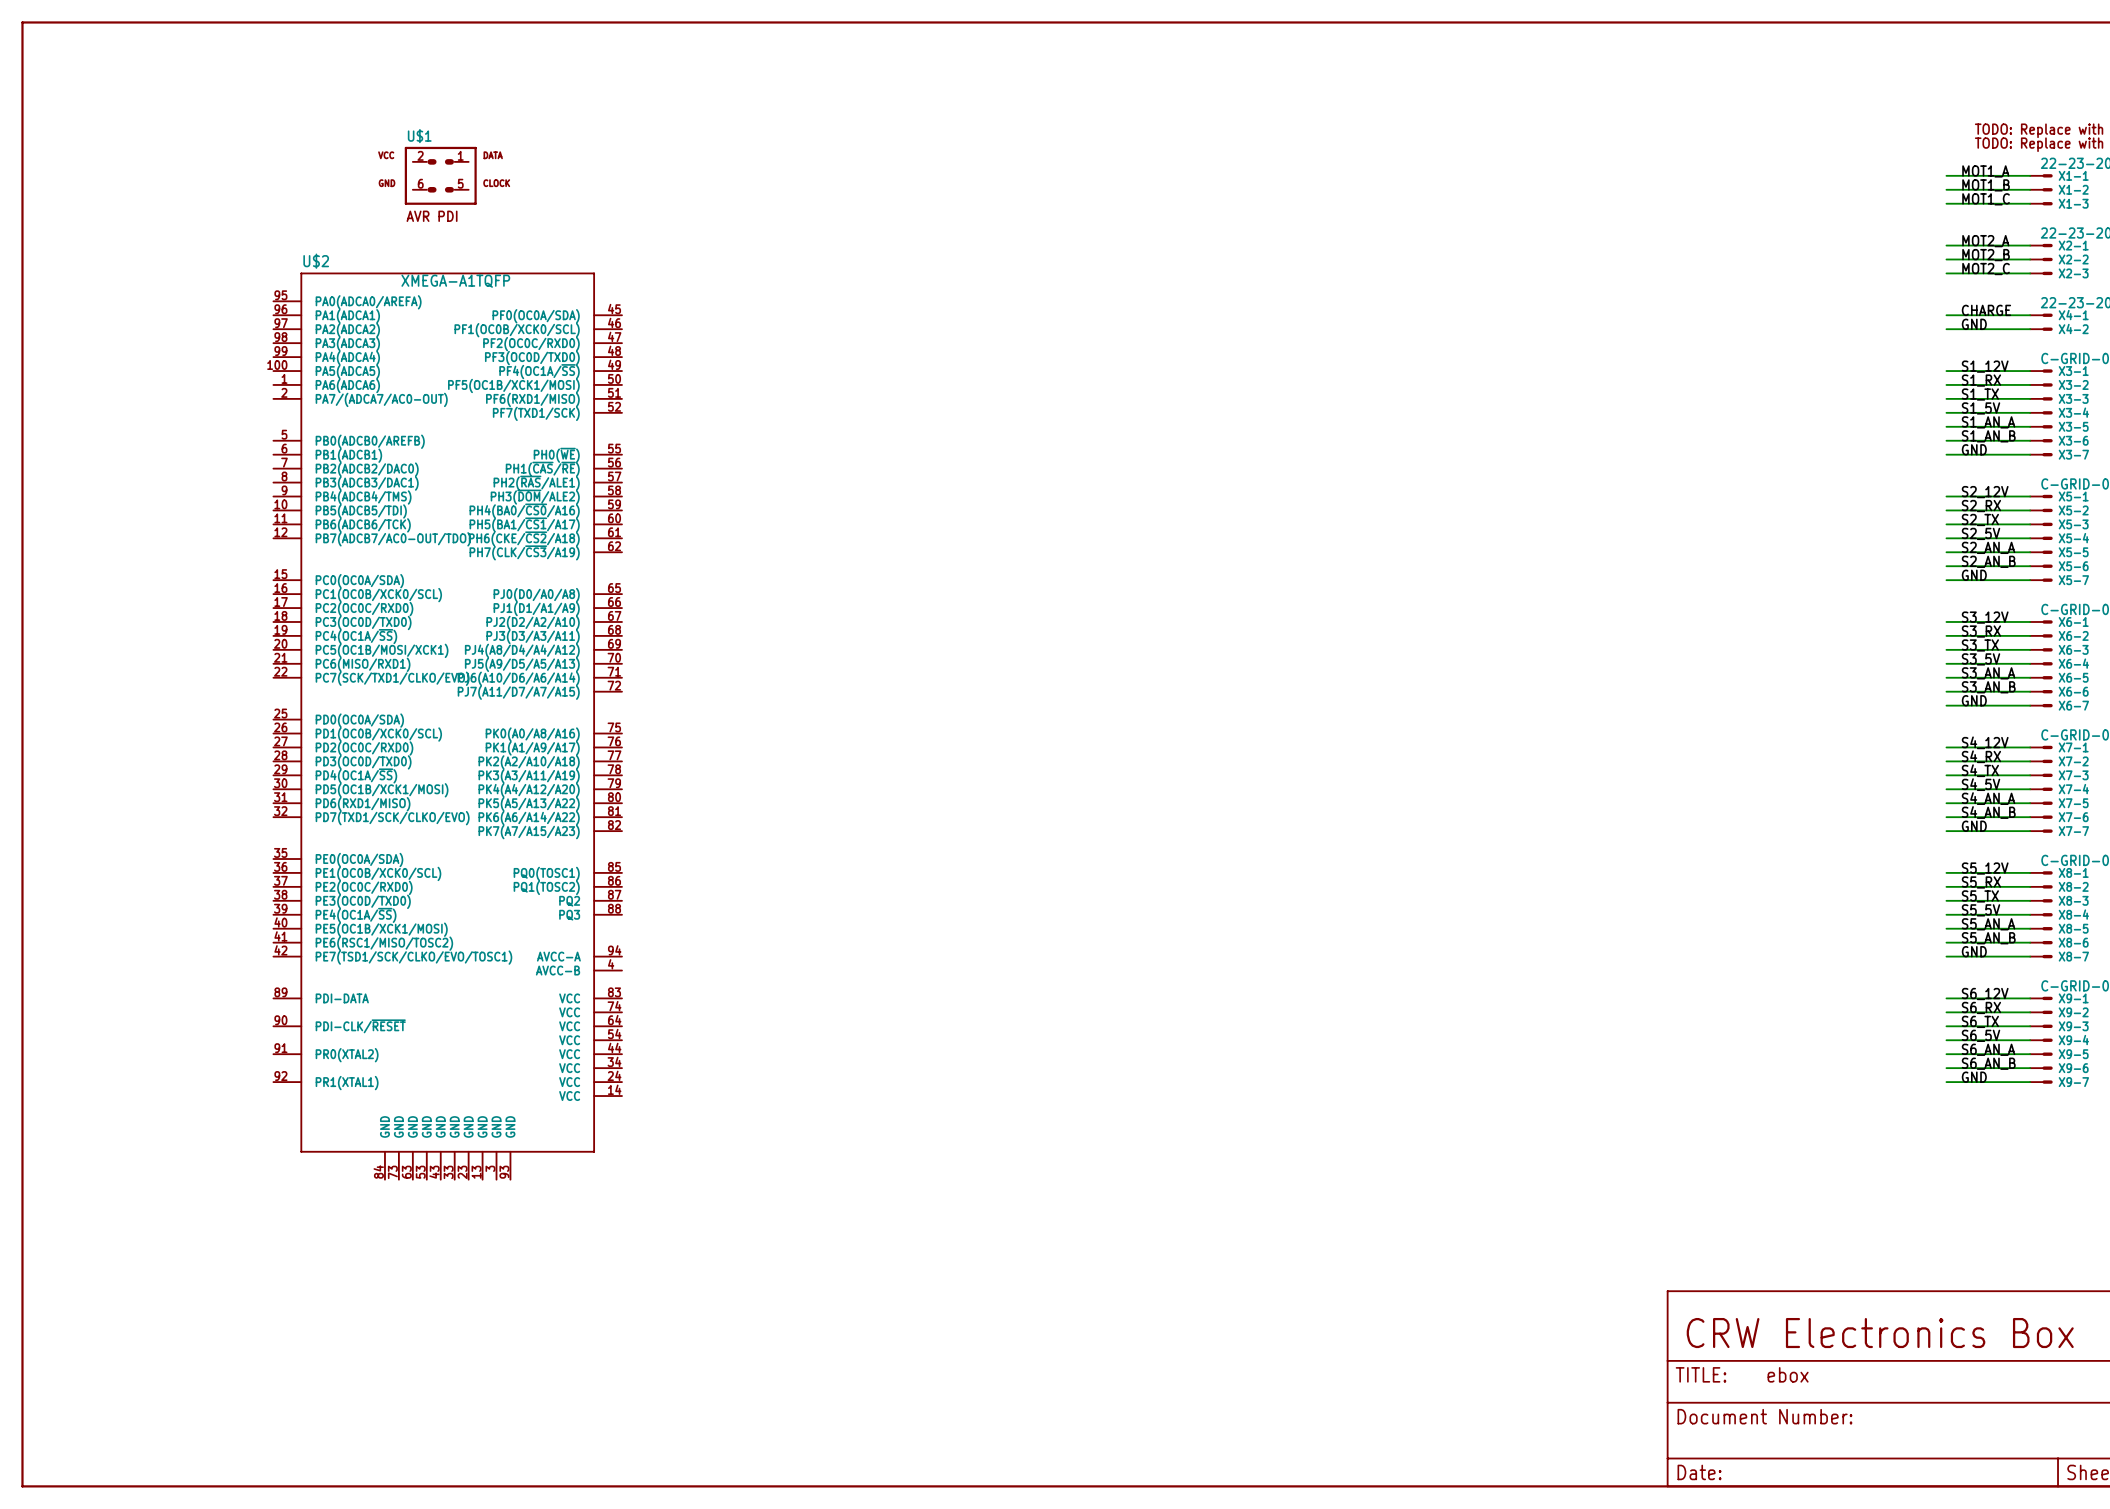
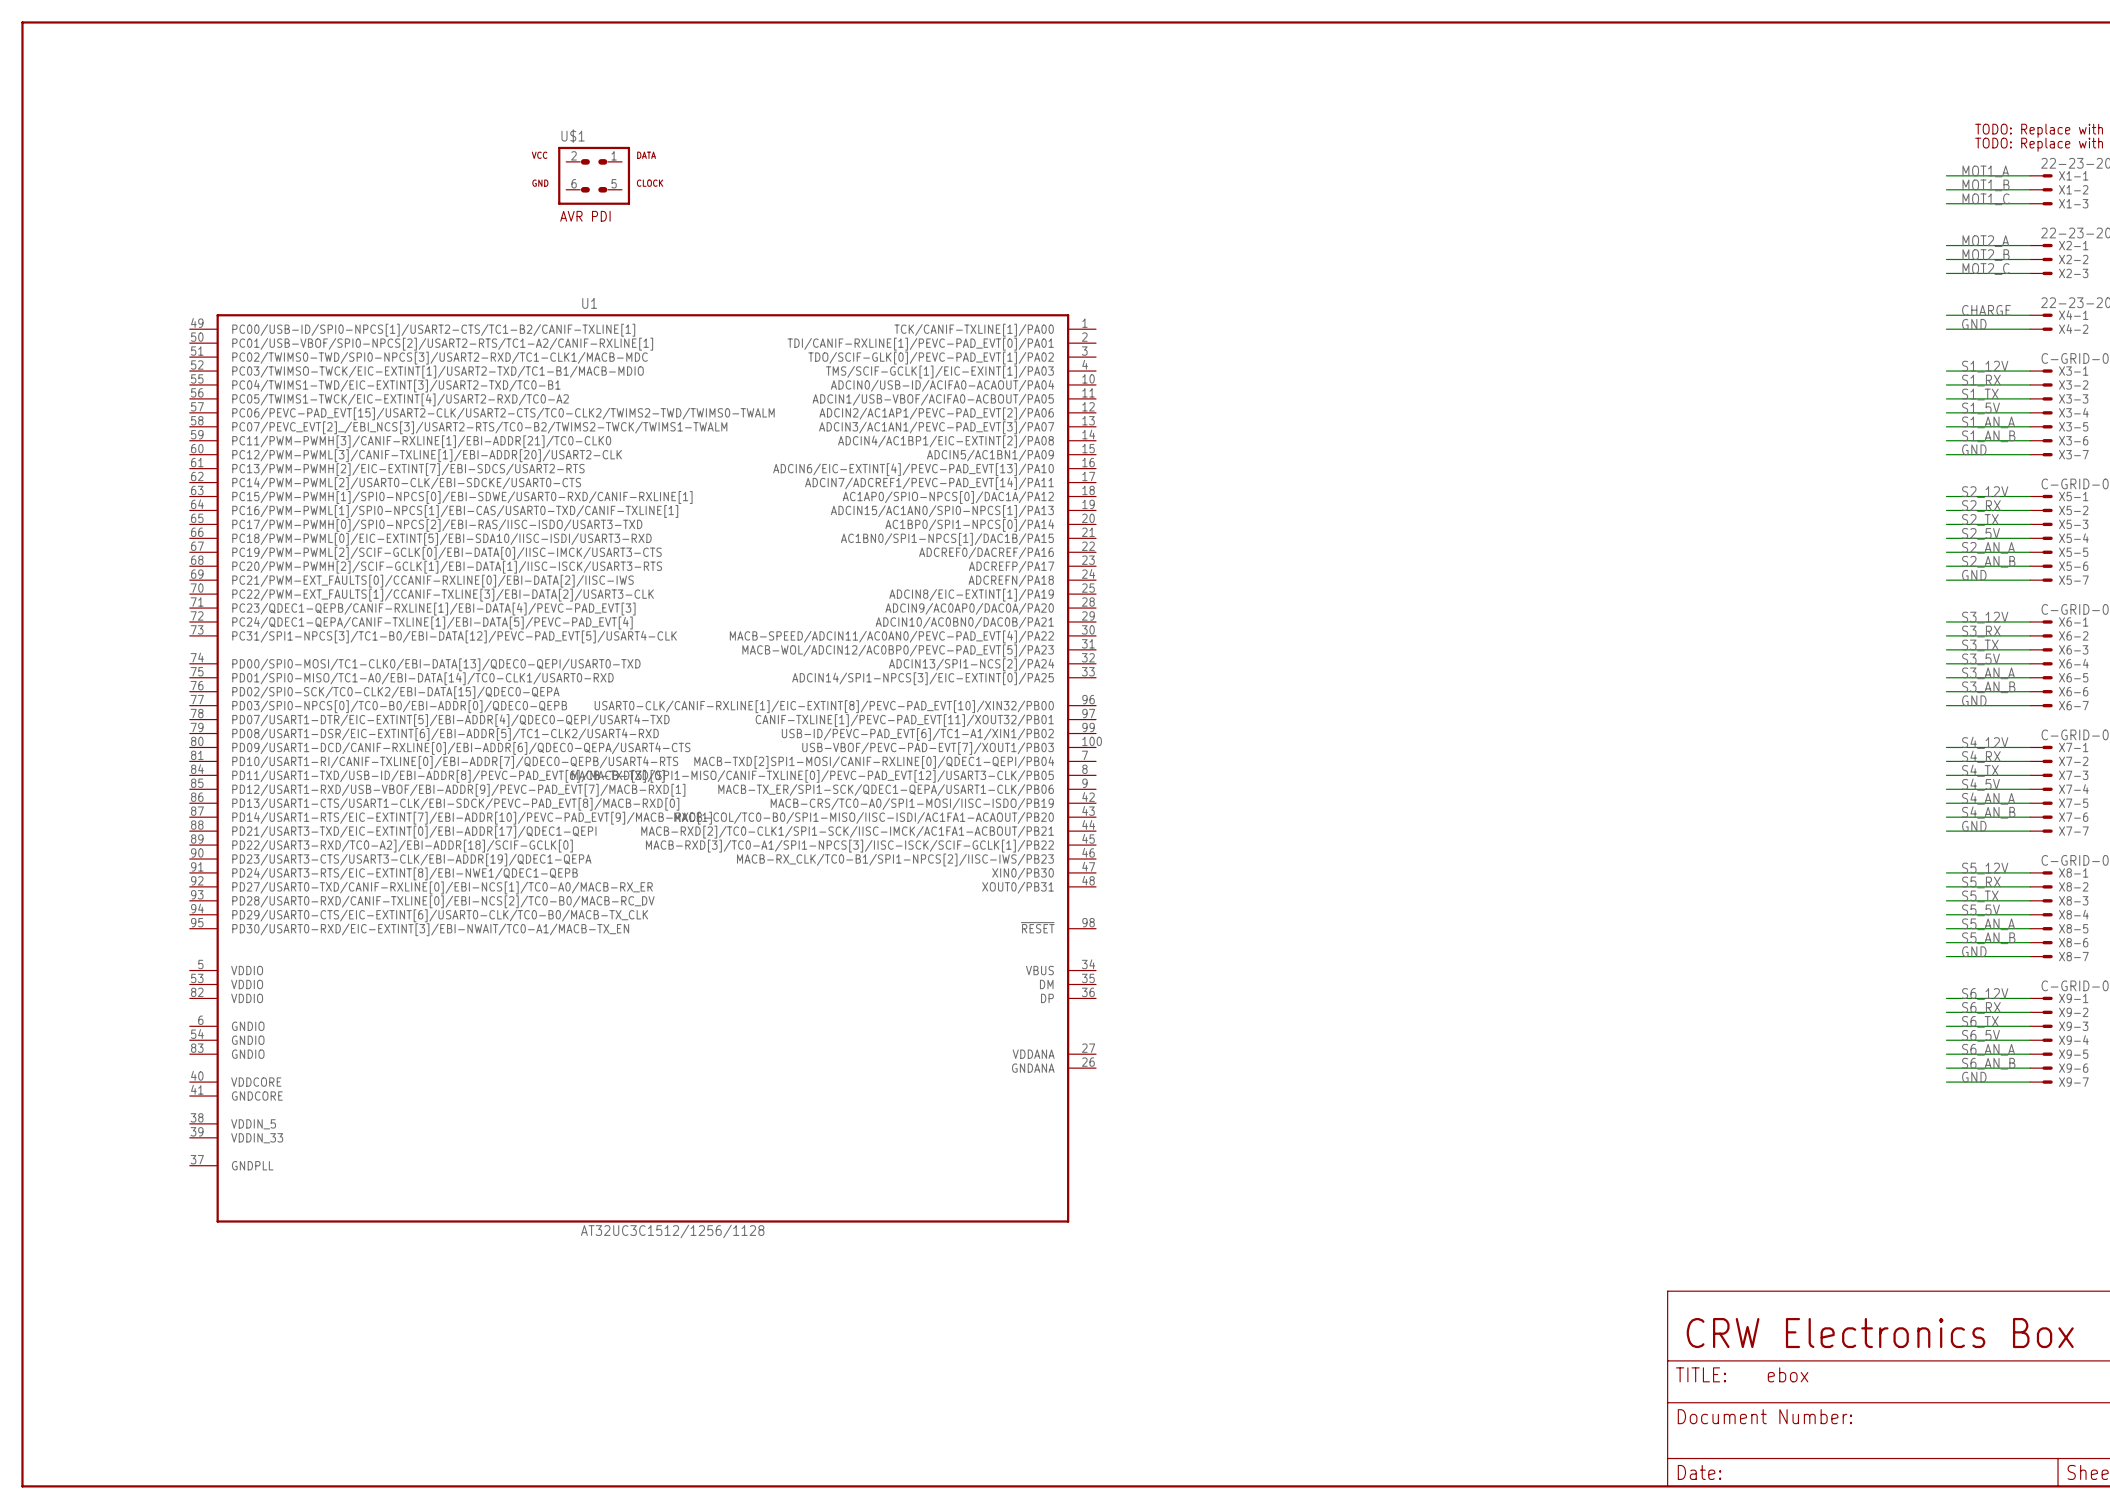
U$1 position: (440, 175) -> (594, 175)
U$2: XMEGA-A1TQFP (447, 726) -> none
U1: none -> AT32UC3C1512/1256/1128 (642, 768)

